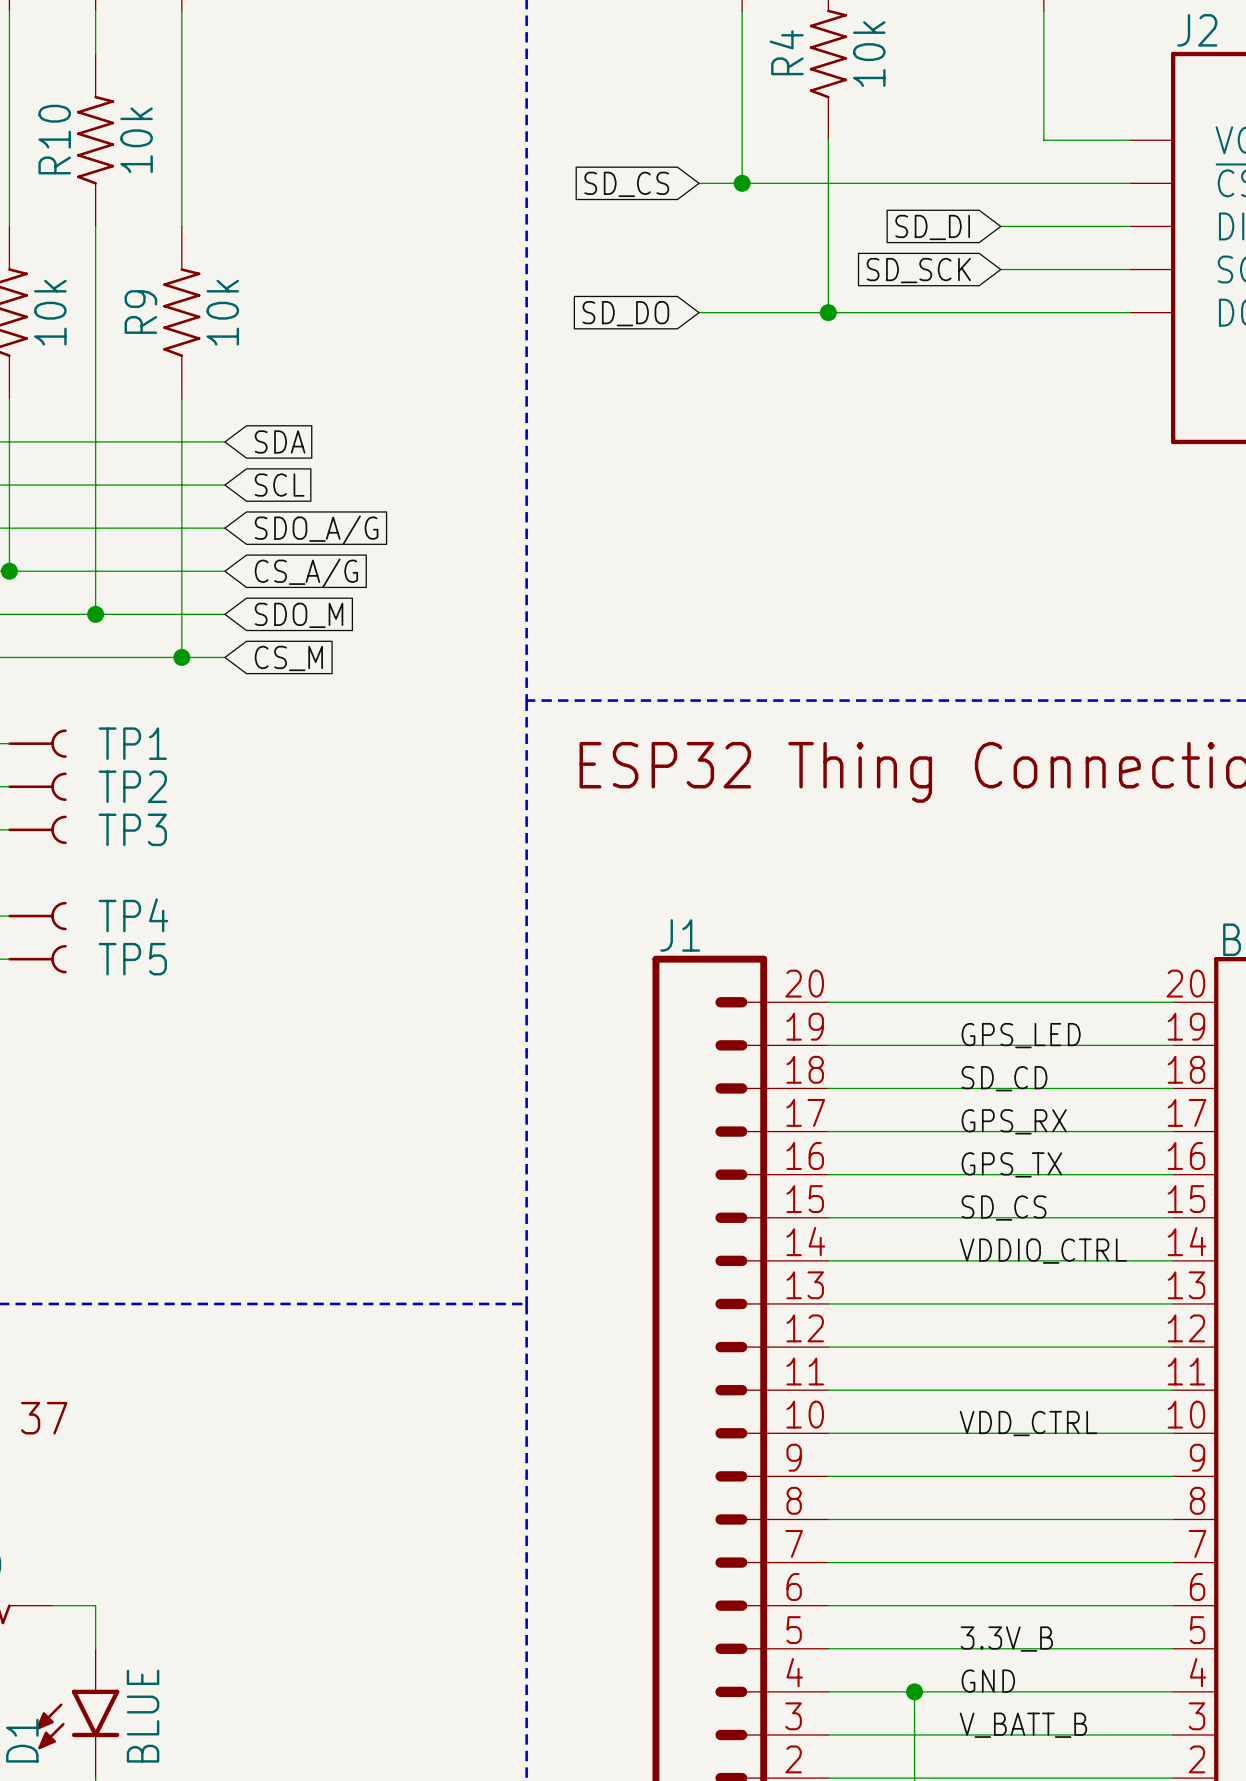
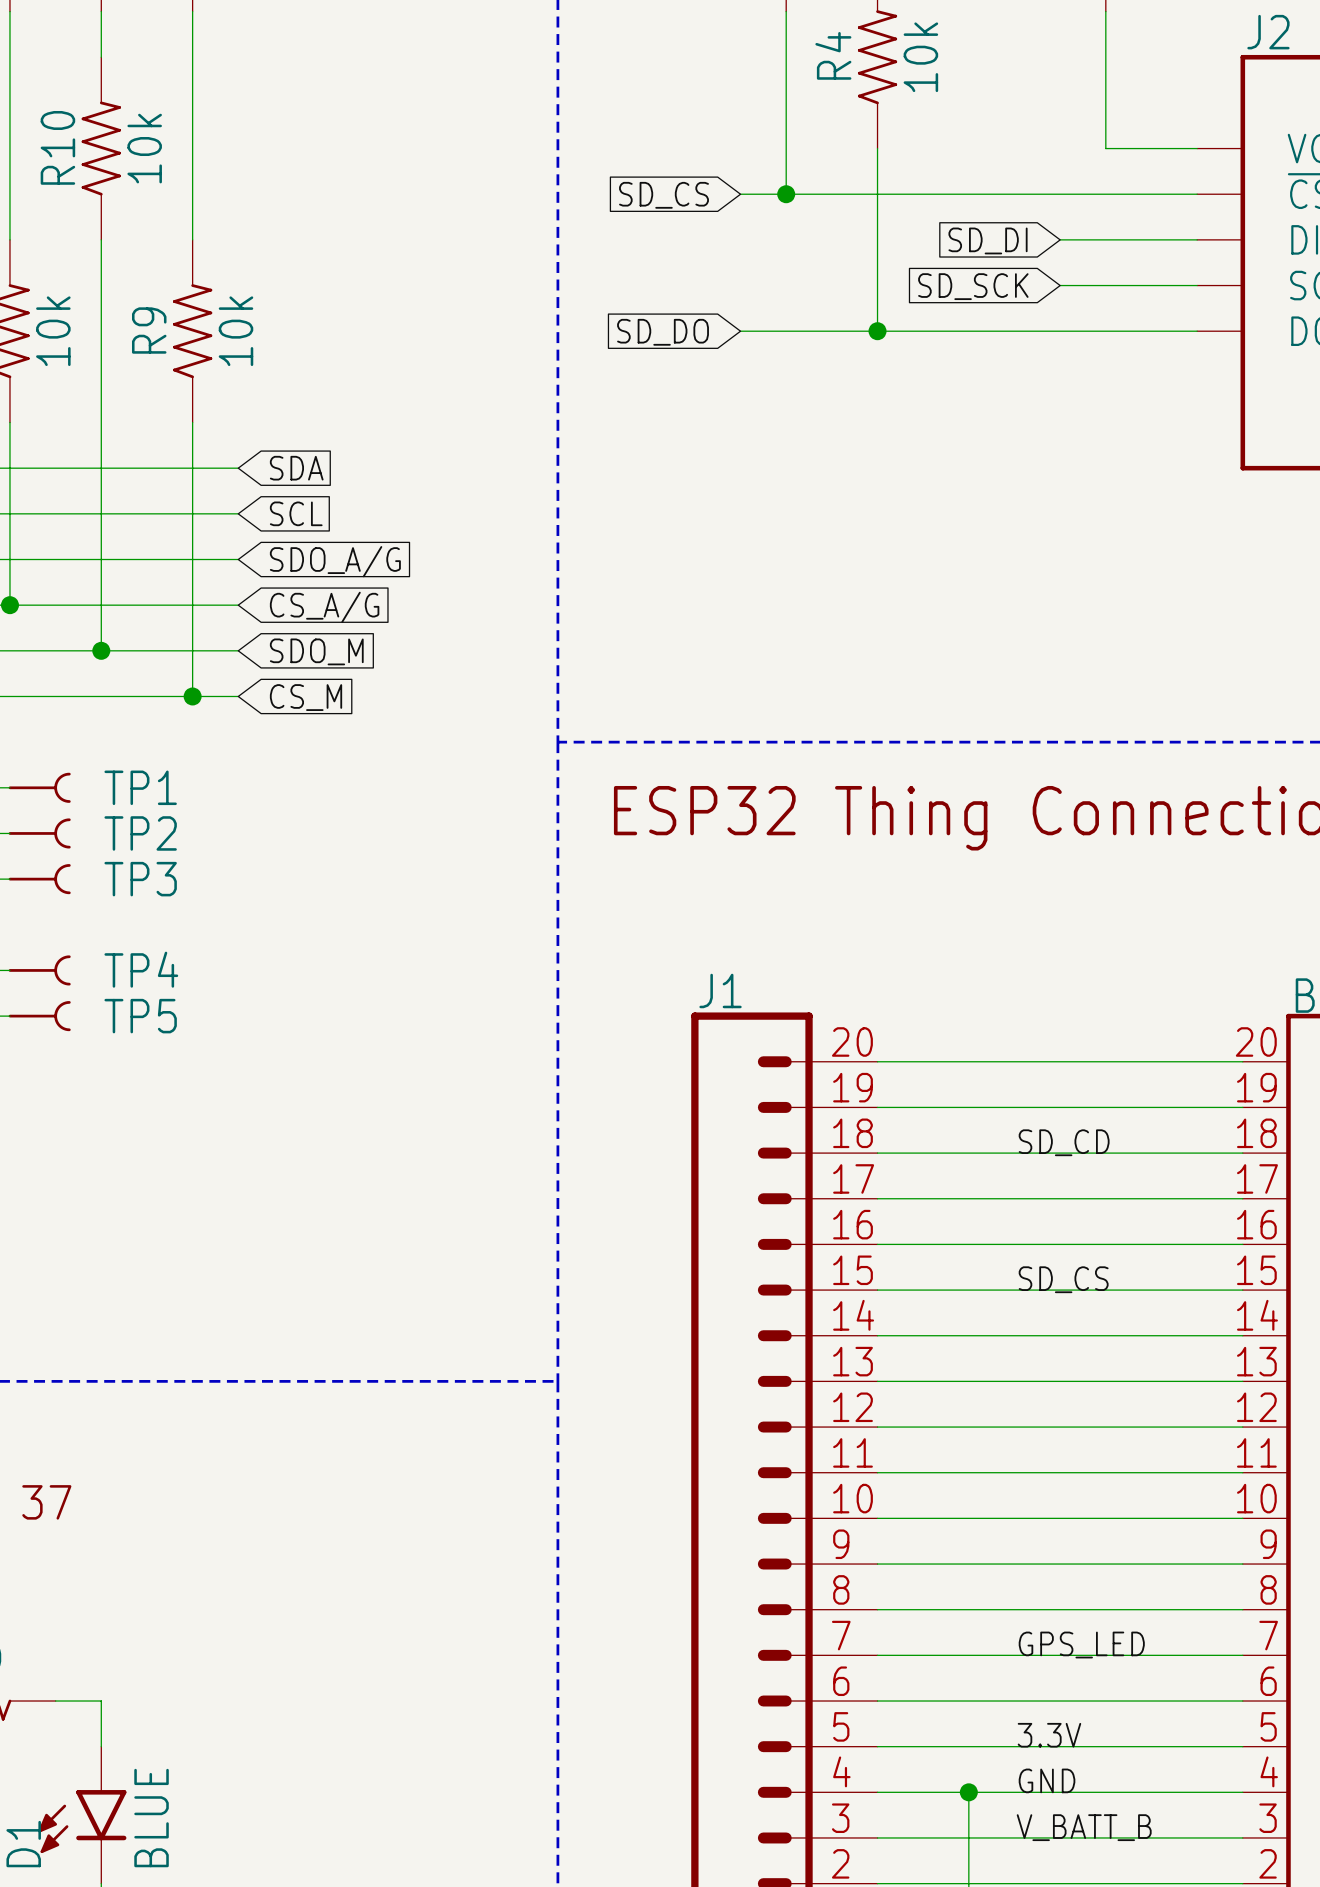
label: GPS_LED (1021, 1035) -> none
label: GPS_RX (1014, 1121) -> none
label: GPS_TX (1011, 1164) -> none
label: VDDIO_CTRL (1043, 1251) -> none
label: VDD_CTRL (1028, 1423) -> none
label: none -> GPS_LED (1081, 1645)
label: 3.3V_B (1006, 1639) -> 3.3V (1049, 1735)

